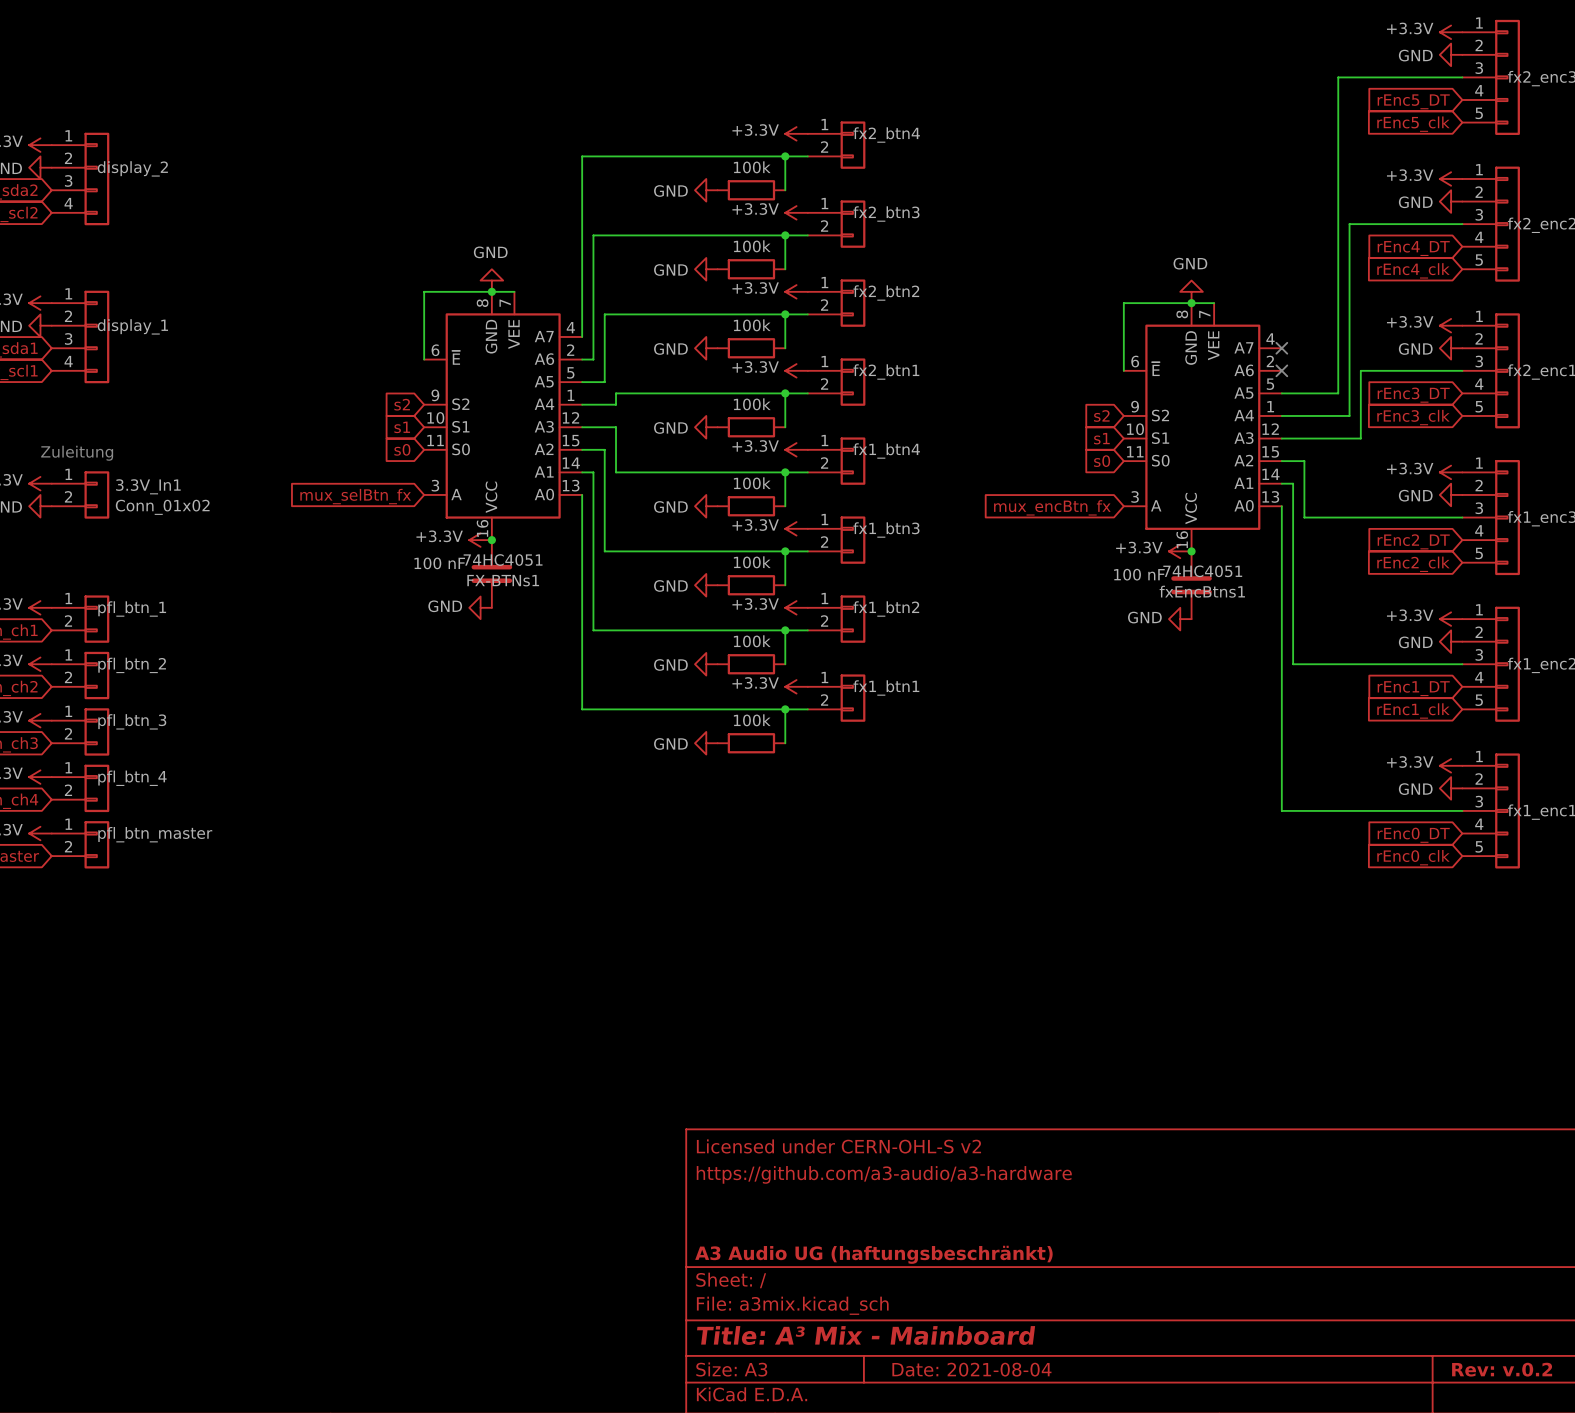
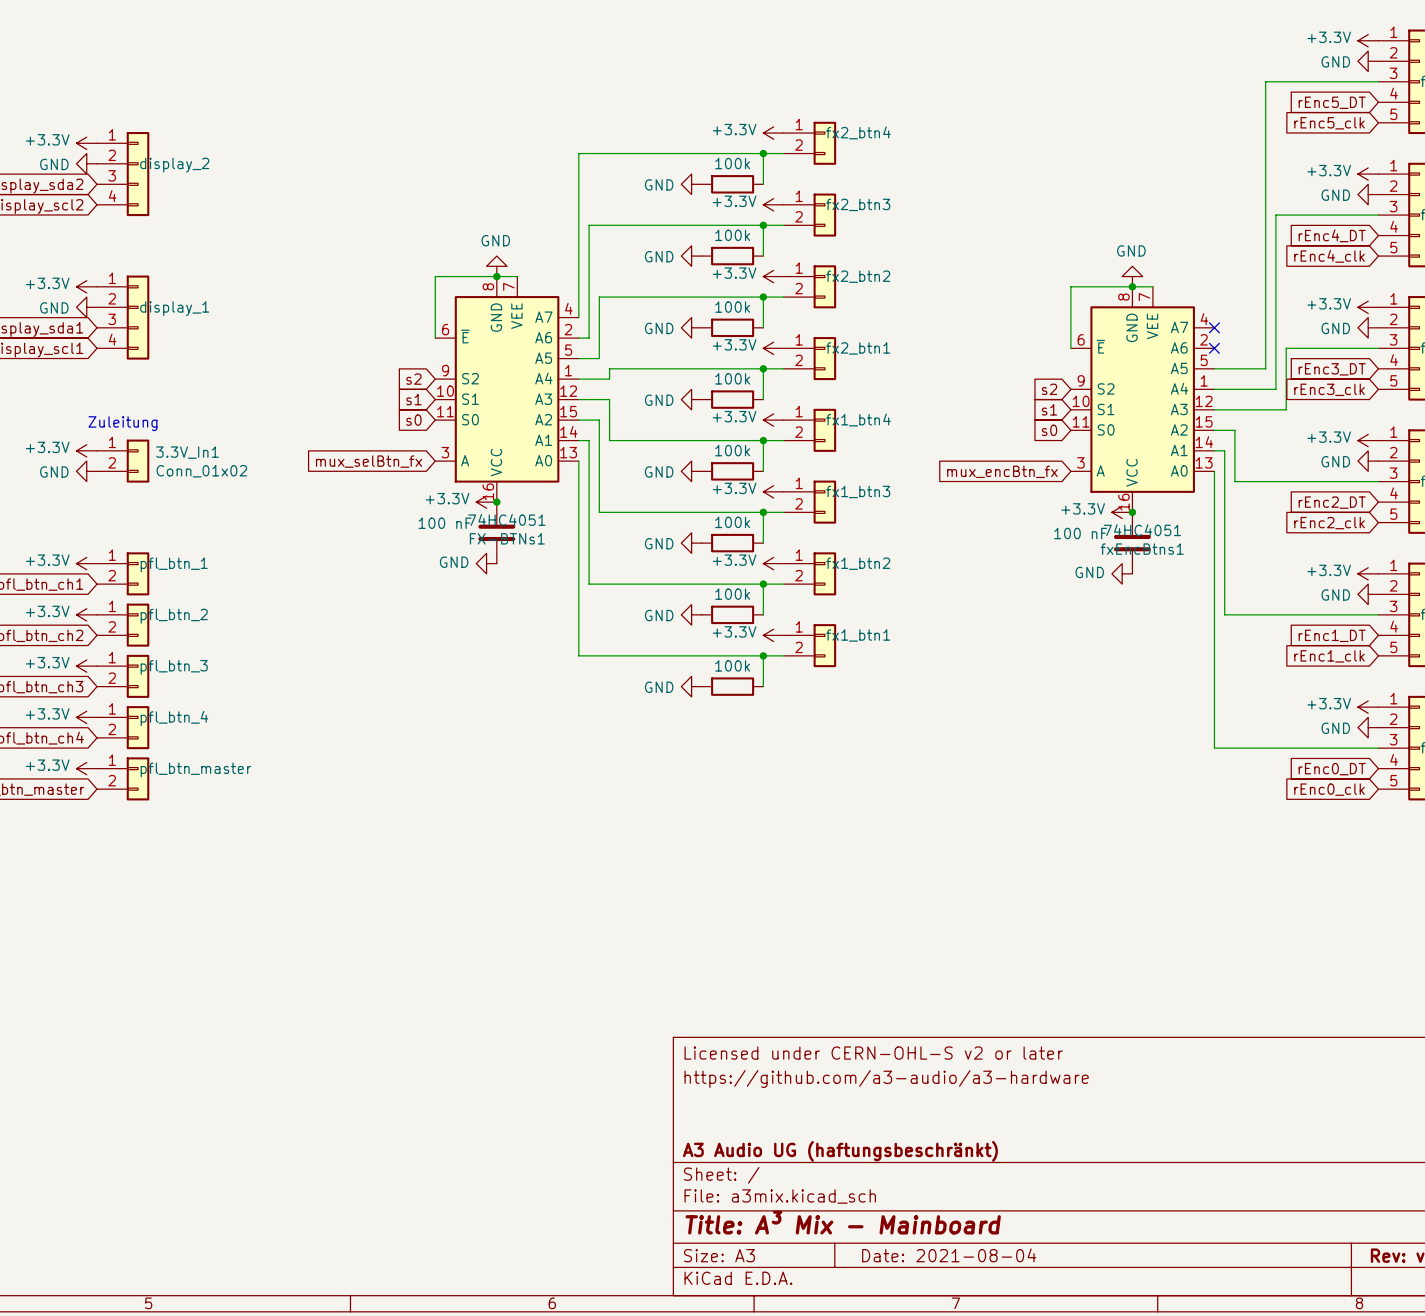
title block: Licensed under CERN-OHL-S v2 (838, 1146) -> Licensed under CERN-OHL-S v2 or later (873, 1053)

